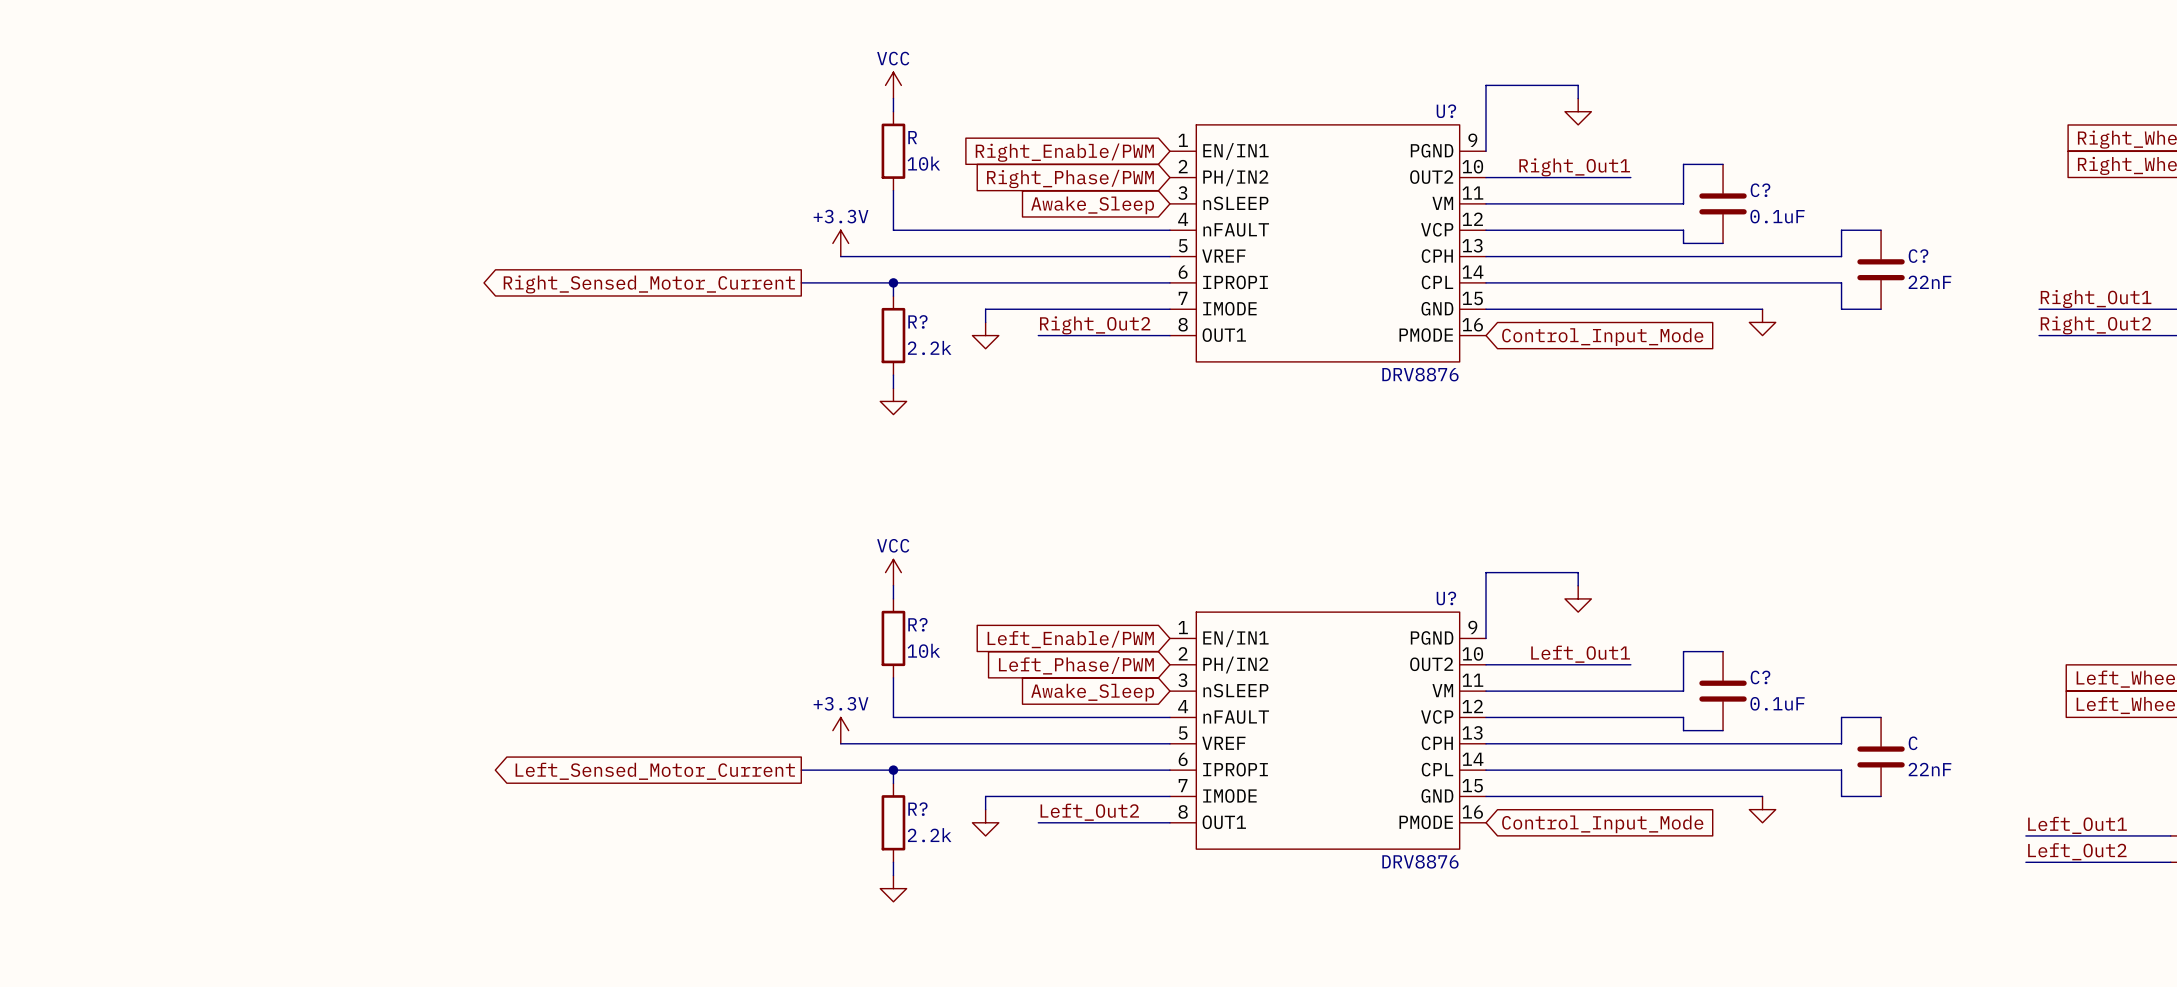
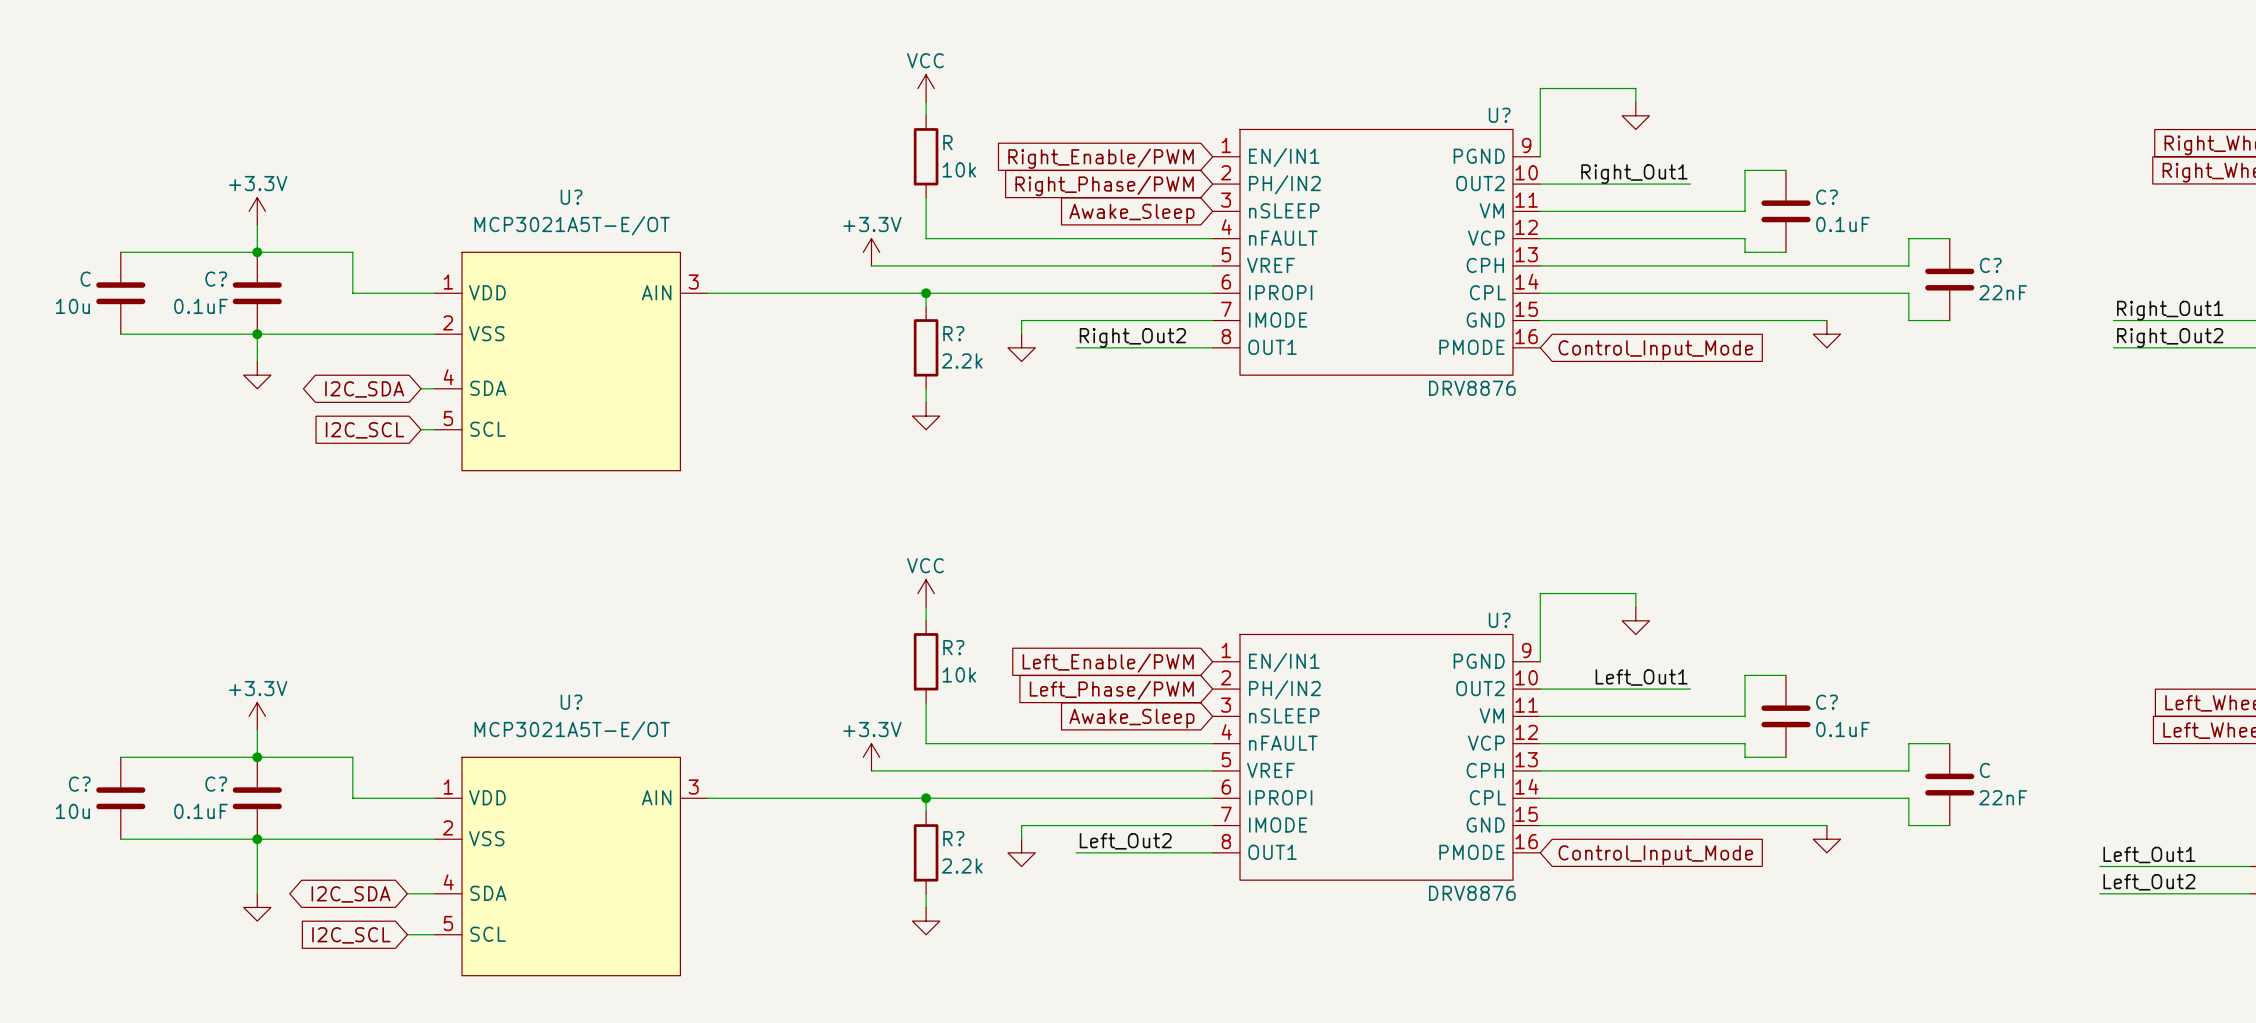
power symbol: none -> +3.3V (257, 211)
wire: none -> (257, 225) (257, 252)
wire: none -> (120, 252) (352, 252) (352, 293) (434, 293)
junction: none -> (257, 252)
C: none -> 10u (120, 293)
C?: none -> 0.1uF (257, 293)
wire: none -> (707, 293) (830, 293)
global label: Right_Sensed_Motor_Current (649, 284) -> none
wire: none -> (120, 334) (434, 334)
wire: none -> (257, 334) (257, 361)
junction: none -> (257, 334)
U?: none -> MCP3021A5T-E/OT (571, 361)
power symbol: none -> (257, 375)
wire: none -> (421, 388) (434, 388)
global label: none -> I2C_SDA (364, 389)
wire: none -> (421, 429) (434, 429)
global label: none -> I2C_SCL (364, 430)
power symbol: none -> +3.3V (257, 716)
wire: none -> (257, 730) (257, 757)
wire: none -> (120, 757) (352, 757) (352, 798) (434, 798)
junction: none -> (257, 757)
C?: none -> 10u (120, 798)
C?: none -> 0.1uF (257, 798)
wire: none -> (707, 798) (830, 798)
global label: Left_Sensed_Motor_Current (655, 771) -> none
wire: none -> (120, 839) (434, 839)
wire: none -> (257, 839) (257, 893)
junction: none -> (257, 839)
U?: none -> MCP3021A5T-E/OT (571, 866)
wire: none -> (407, 893) (434, 893)
global label: none -> I2C_SDA (351, 894)
power symbol: none -> (257, 907)
wire: none -> (407, 934) (434, 934)
global label: none -> I2C_SCL (351, 935)

